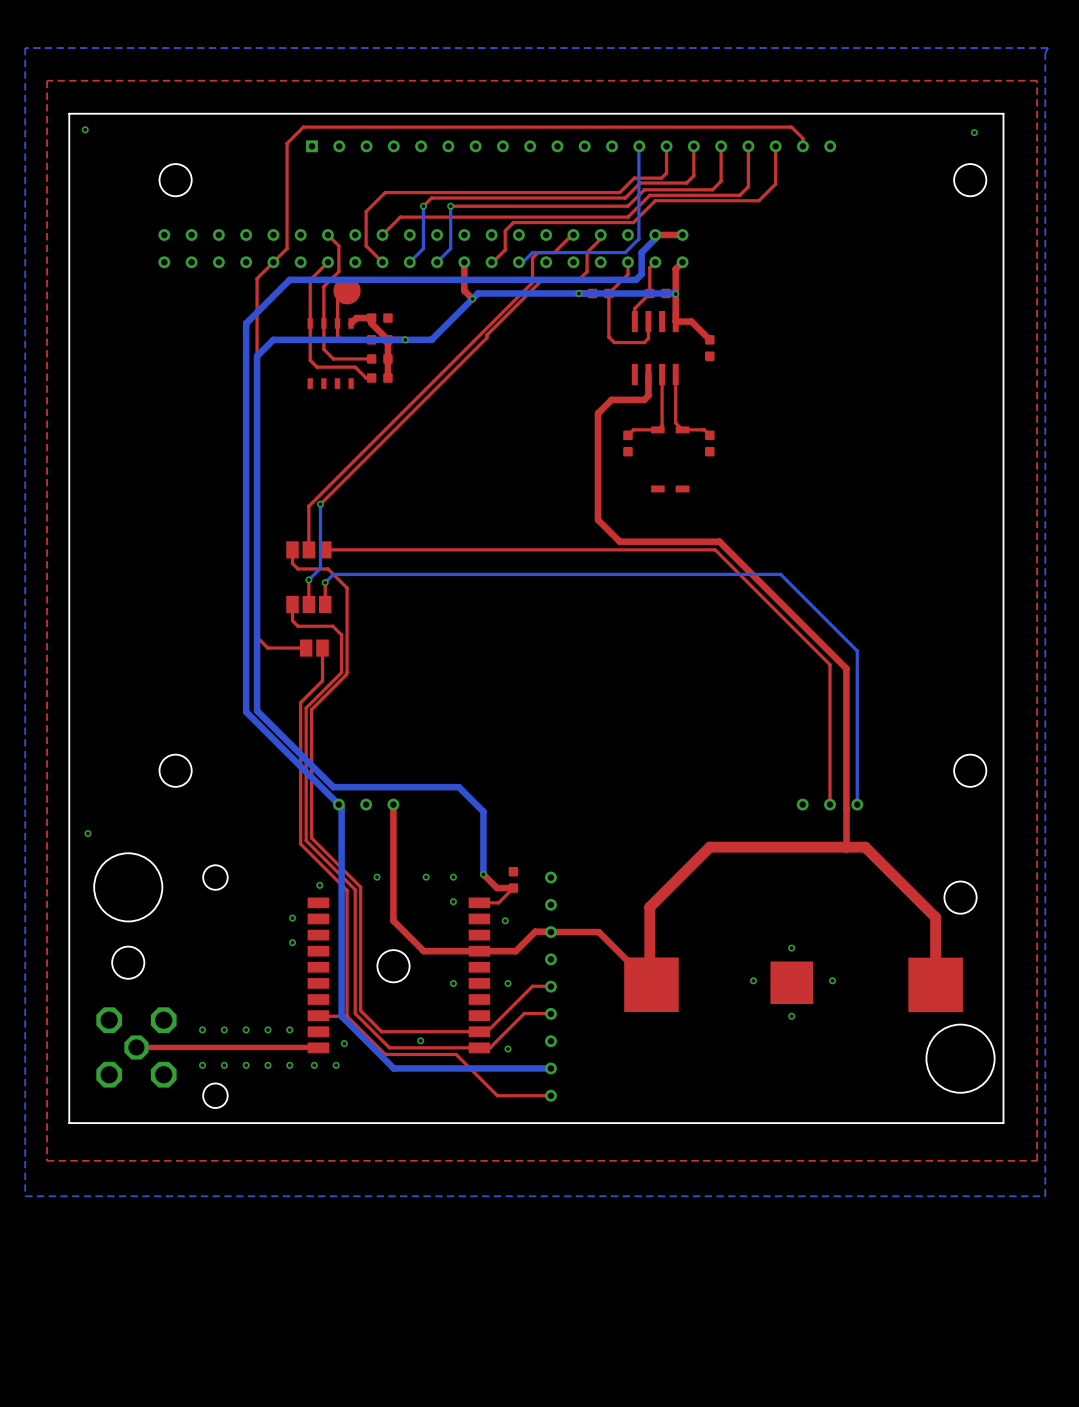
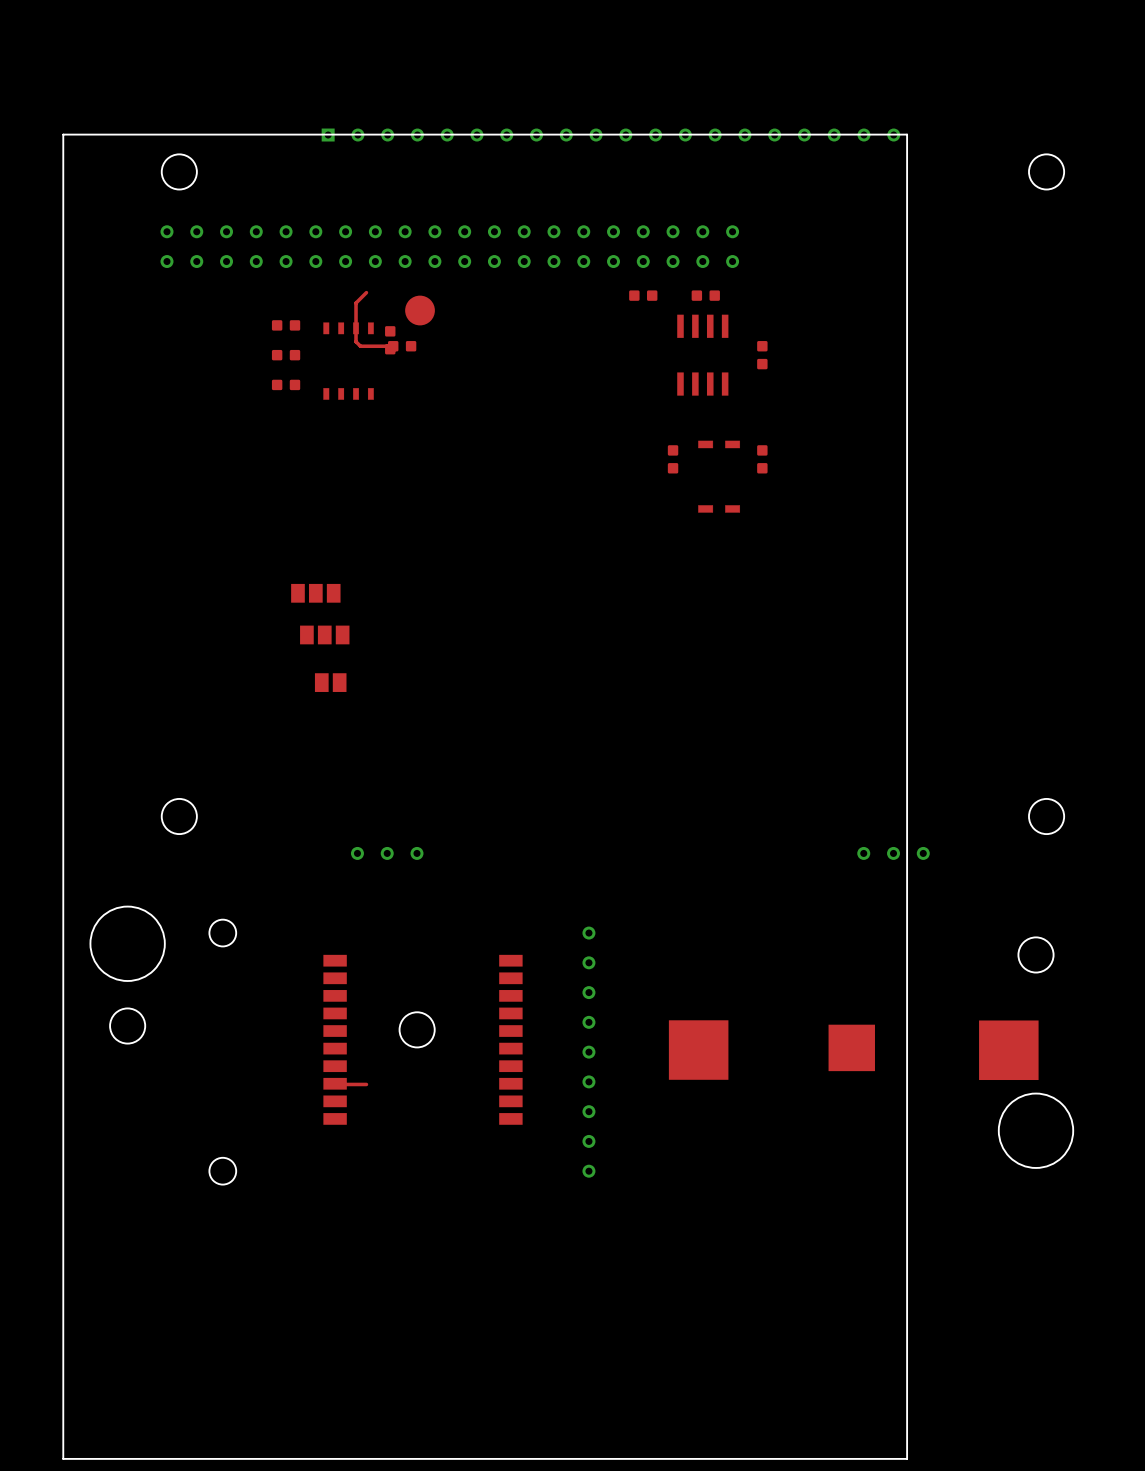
bottom zone outline: (1048, 48) (25, 48) (25, 1196) (1045, 1196) (1045, 53) (1048, 48) -> none
top zone outline: (1037, 80) (47, 80) (47, 1160) (1037, 1160) (1037, 80) -> none
via: (85, 129) -> none
via: (974, 132) -> none
board edge: (69, 145) (69, 113) (1003, 113) (1003, 1123) (69, 1123) -> (63, 134) (907, 134) (907, 1458) (63, 1458) (63, 1201)
bottom track: (639, 146) (638, 238) (625, 252) (532, 252) (522, 262) (518, 262) -> none
top track: (666, 146) (666, 173) (661, 178) (634, 178) (619, 192) (385, 192) (366, 211) (366, 245) (382, 262) -> none
top track: (693, 146) (693, 175) (686, 183) (640, 183) (625, 198) (431, 198) (423, 206) -> none
top track: (721, 146) (721, 181) (712, 189) (644, 189) (627, 206) (450, 206) -> none
top track: (748, 146) (748, 186) (739, 195) (649, 195) (627, 217) (400, 217) (382, 234) -> none
top track: (775, 146) (775, 184) (758, 200) (655, 200) (633, 222) (513, 222) (505, 230) (505, 249) (491, 262) -> none
top track: (802, 146) (802, 138) (791, 127) (303, 127) (287, 143) (287, 248) (257, 278) (257, 637) (267, 648) (306, 648) -> none
bottom track: (423, 206) (423, 248) (409, 262) -> none
via: (423, 206) -> none
bottom track: (450, 206) (450, 248) (437, 262) -> none
via: (450, 206) -> none
top track: (327, 234) (338, 245) (338, 271) (323, 286) (323, 349) (333, 358) (371, 358) -> none
top track: (573, 234) (554, 252) (537, 252) (532, 258) (532, 282) (308, 506) (308, 549) -> none
top track: (600, 234) (600, 238) (587, 252) (587, 271) (578, 279) (542, 279) (320, 504) -> none
bottom track: (655, 234) (655, 238) (641, 252) (641, 274) (636, 279) (289, 279) (246, 323) (246, 711) (341, 807) (341, 1016) (393, 1068) (550, 1068) -> none
top track: (682, 234) (655, 234) -> none
top track: (327, 262) (310, 279) (310, 360) (317, 367) (355, 367) (366, 378) (371, 378) -> none
top track: (464, 262) (464, 290) (472, 298) -> none
top track: (627, 262) (627, 274) (608, 293) (608, 337) (614, 342) (644, 342) (648, 338) (648, 321) -> none
top track: (655, 262) (649, 267) (649, 293) (634, 308) (634, 321) -> none
top track: (682, 262) (675, 269) (675, 321) (691, 321) (709, 339) -> none
part position: (347, 290) -> (420, 310)
via: (578, 293) -> none
bottom track: (675, 294) (477, 293) (431, 339) (273, 339) (257, 356) (257, 710) (333, 787) (458, 787) (483, 811) (483, 874) -> none
via: (675, 294) -> none
via: (472, 298) -> none
part: (379, 318) -> none
part: none -> (286, 325)
top track: (351, 323) (356, 318) (371, 318) (371, 323) (387, 339) -> none
part: none -> (390, 340)
top track: (387, 339) (387, 378) -> none
via: (405, 339) -> none
part: none -> (286, 355)
part: (379, 358) -> none
top track: (648, 374) (648, 395) (644, 399) (611, 399) (597, 413) (597, 519) (619, 541) (719, 541) (846, 668) (846, 809) -> none
top track: (662, 374) (662, 425) (657, 429) (633, 429) (627, 435) -> none
top track: (675, 374) (675, 423) (682, 429) (704, 429) (709, 435) -> none
part: none -> (286, 384)
part: (379, 378) -> none
bottom track: (320, 504) (320, 568) (308, 579) -> none
via: (320, 504) -> none
top track: (292, 549) (292, 563) (297, 568) (327, 568) (347, 588) (346, 674) (311, 709) (311, 838) (360, 887) (360, 1010) (381, 1031) (487, 1031) (532, 986) (550, 986) -> none
part position: (308, 549) -> (315, 593)
top track: (325, 549) (715, 549) (829, 664) (829, 804) -> none
top track: (308, 579) (308, 604) -> none
via: (308, 579) -> none
top track: (325, 582) (325, 604) -> none
bottom track: (325, 582) (333, 574) (780, 574) (857, 650) (857, 804) -> none
via: (325, 582) -> none
top track: (292, 604) (292, 620) (297, 626) (332, 626) (341, 634) (341, 672) (306, 708) (306, 840) (355, 889) (355, 1013) (389, 1047) (490, 1047) (524, 1013) (550, 1013) -> none
top track: (322, 648) (322, 680) (300, 702) (300, 844) (347, 890) (347, 1016) (385, 1054) (456, 1054) (497, 1095) (550, 1095) -> none
top track: (393, 804) (393, 920) (423, 951) (515, 951) (535, 931) (598, 932) (651, 984) (649, 983) (649, 907) (709, 847) (865, 847) (935, 917) (935, 984) -> none
top track: (846, 809) (846, 847) -> none
via: (87, 833) -> none
top track: (483, 874) (497, 888) (513, 888) (498, 902) (479, 902) -> none
via: (483, 874) -> none
via: (377, 877) -> none
via: (426, 877) -> none
via: (453, 877) -> none
part: (513, 879) -> none
via: (319, 885) -> none
via: (453, 901) -> none
via: (292, 918) -> none
via: (505, 920) -> none
via: (292, 942) -> none
via: (791, 948) -> none
via: (753, 980) -> none
via: (832, 980) -> none
via: (453, 983) -> none
via: (507, 983) -> none
via: (791, 1016) -> none
via: (202, 1029) -> none
via: (224, 1029) -> none
via: (246, 1029) -> none
via: (267, 1029) -> none
via: (289, 1029) -> none
via: (420, 1040) -> none
via: (344, 1043) -> none
top track: (136, 1047) (318, 1047) -> none
part: (136, 1047) -> none
via: (507, 1048) -> none
via: (202, 1065) -> none
via: (224, 1065) -> none
via: (246, 1065) -> none
via: (267, 1065) -> none
via: (289, 1065) -> none
via: (314, 1065) -> none
via: (336, 1065) -> none

